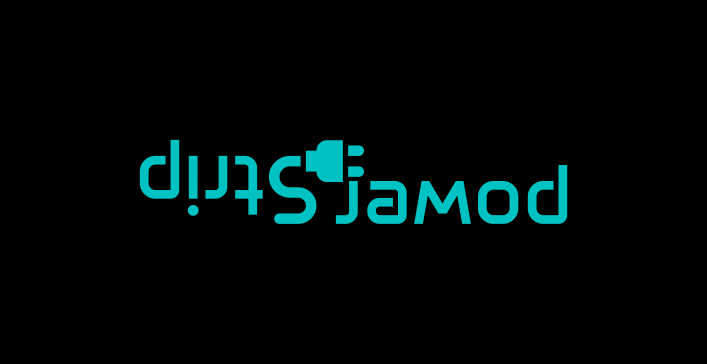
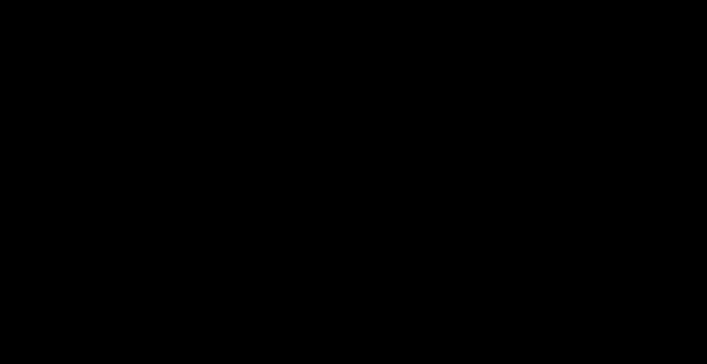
drawing: [139, 139, 568, 224] -> none

